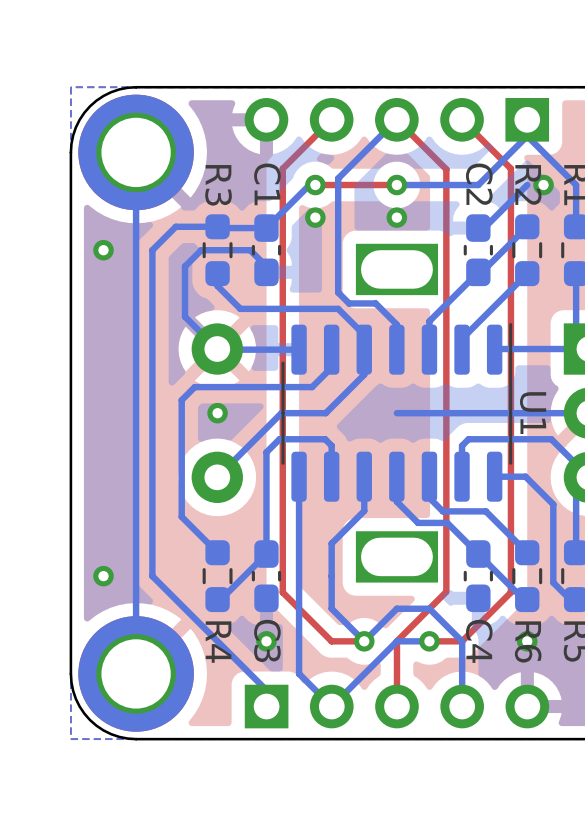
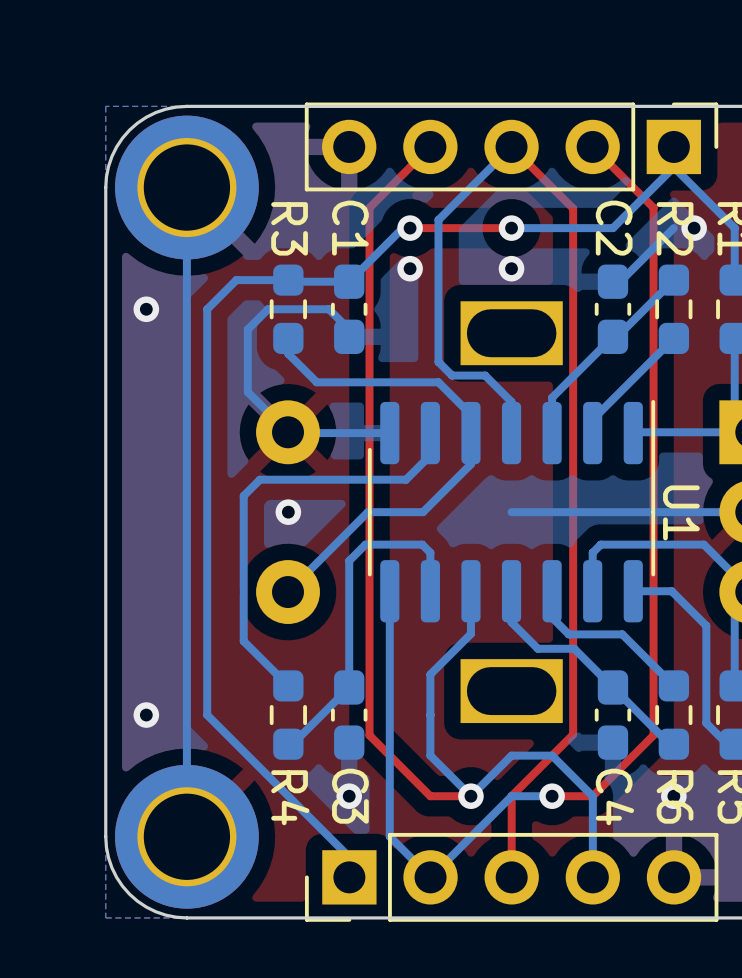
part side: top (396, 119) -> bottom (511, 146)
part side: top (396, 706) -> bottom (511, 877)

